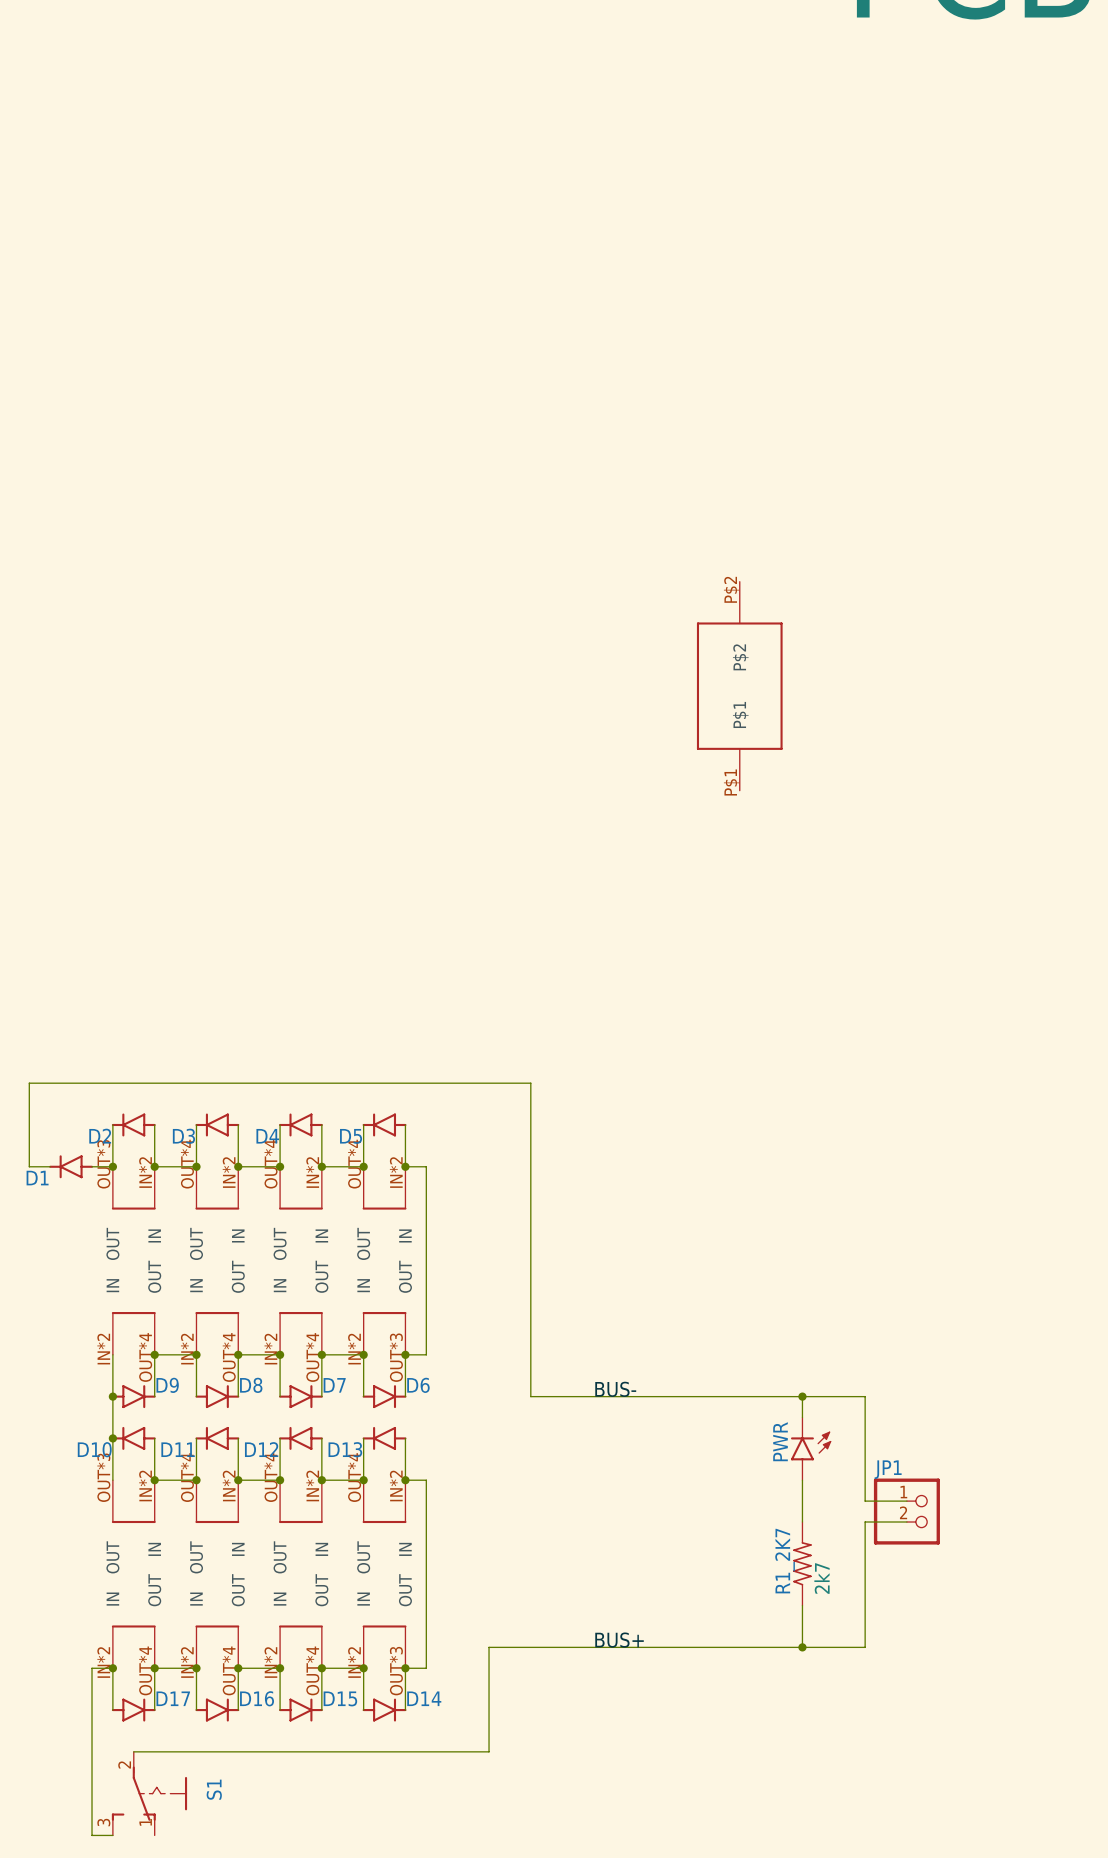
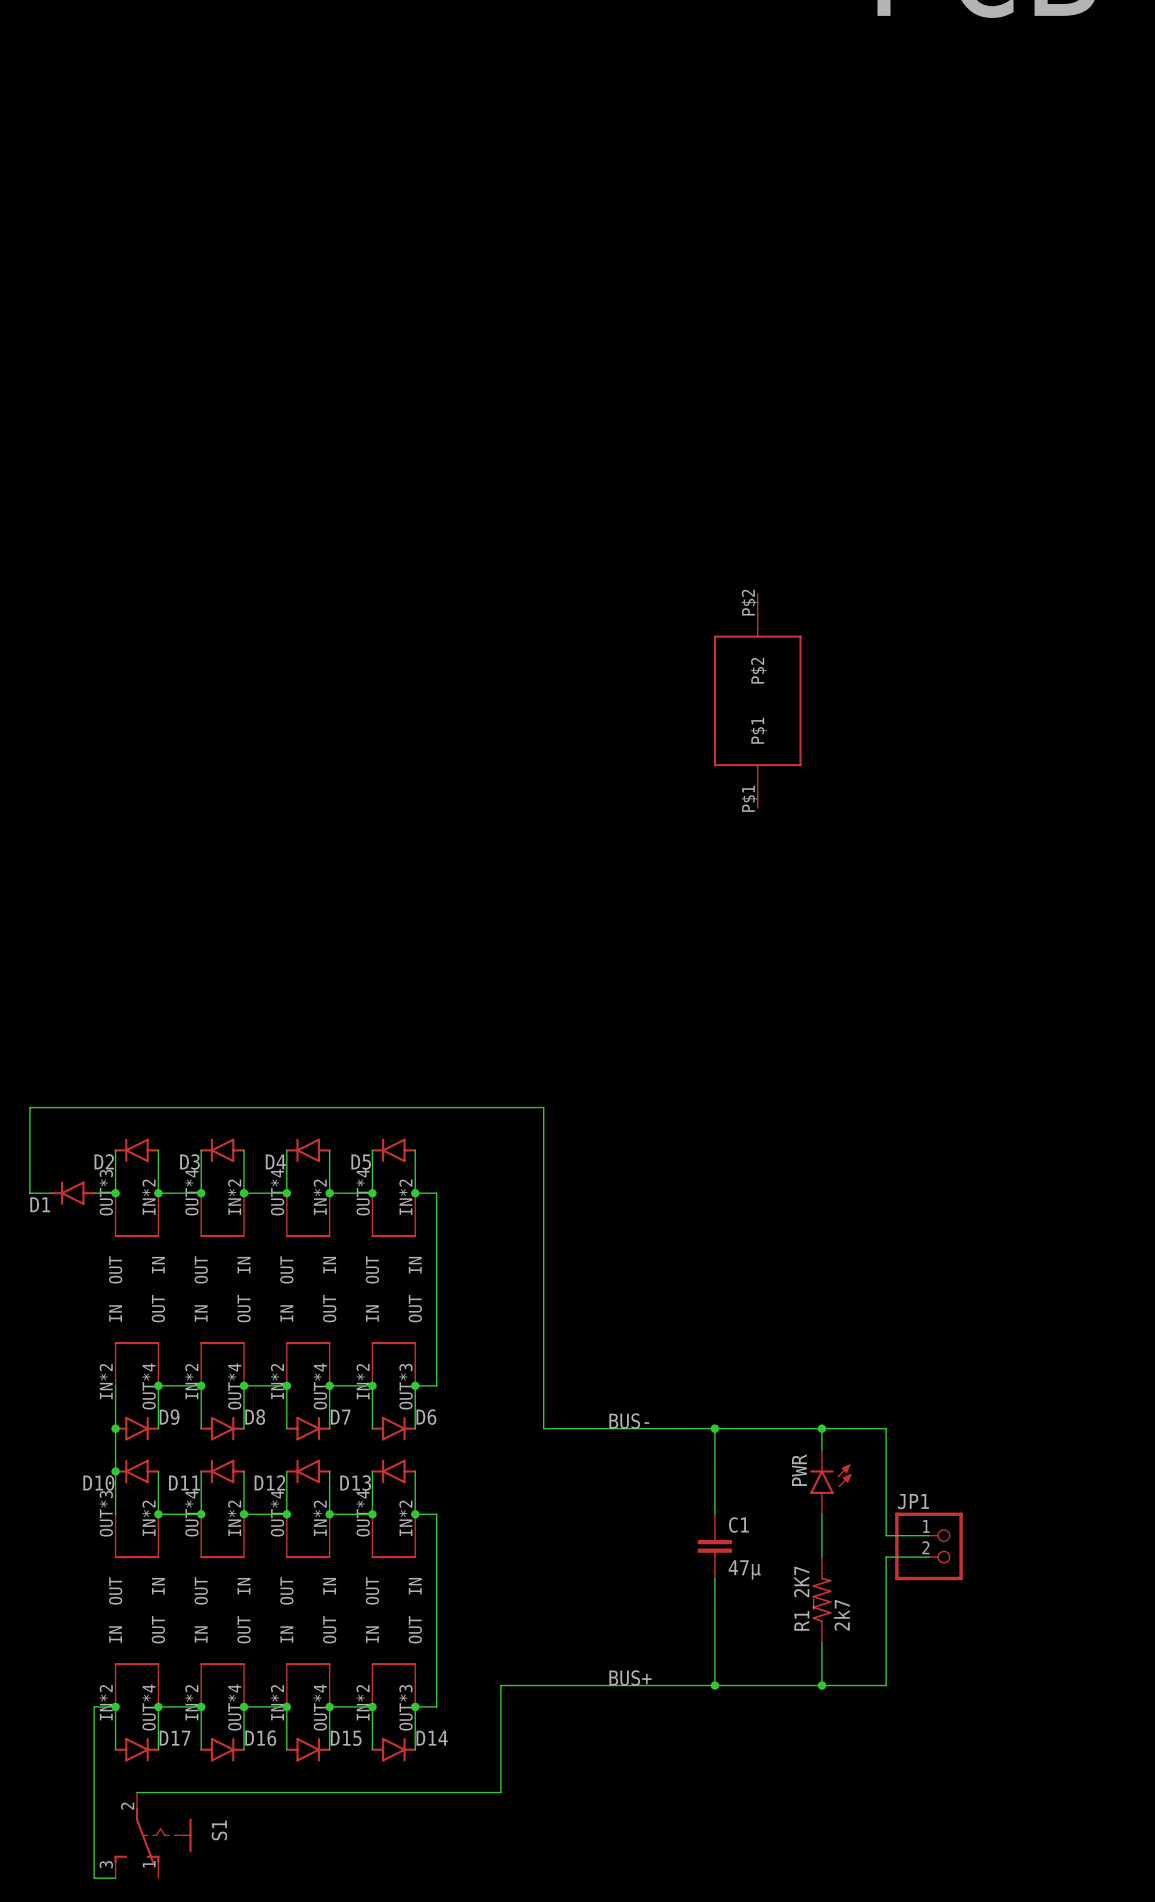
wire: none -> (714, 1428) (714, 1514)
junction: none -> (714, 1428)
C1: none -> 47µ (714, 1546)
wire: none -> (714, 1578) (714, 1685)
junction: none -> (714, 1685)

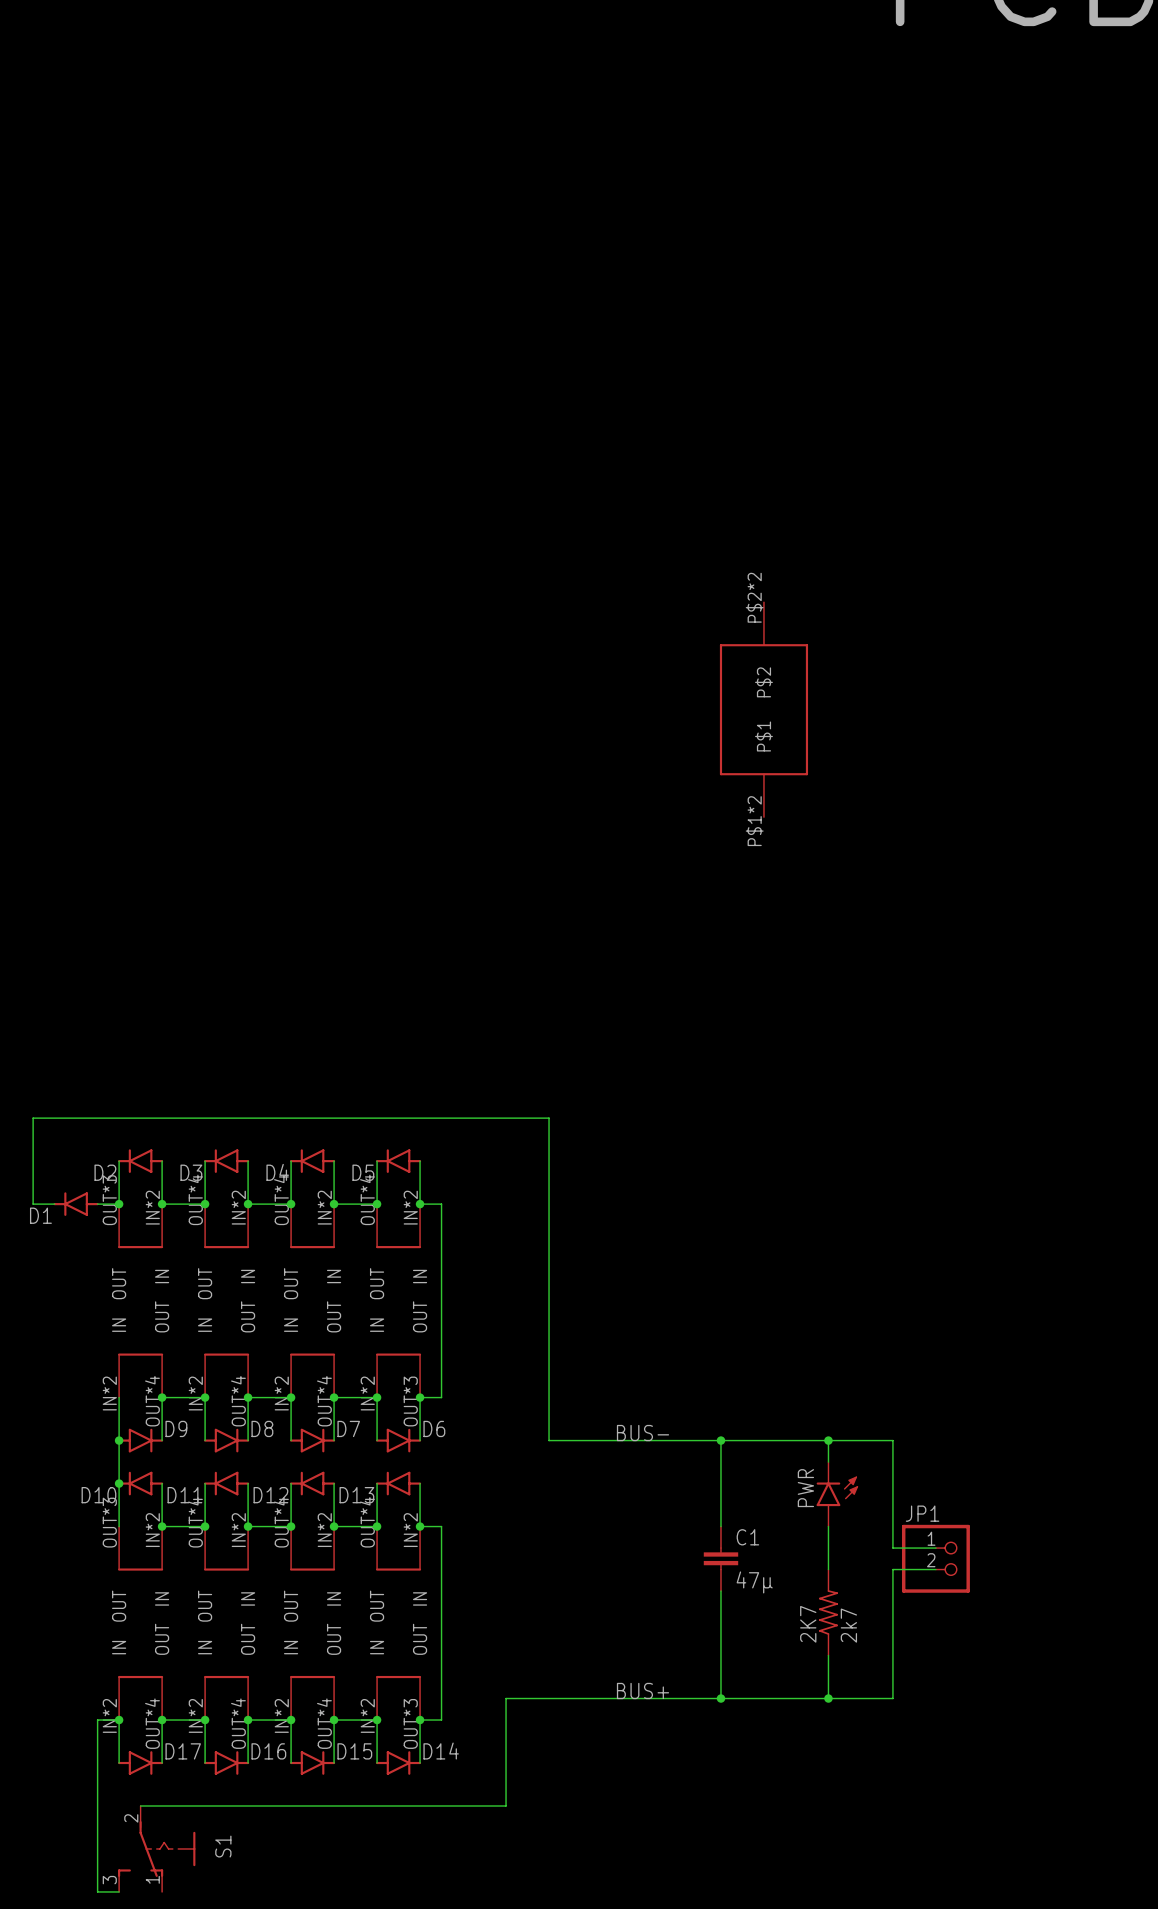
part pin number: P$2 (749, 602) -> P$2*2 (754, 597)
part pin number: P$1 (749, 798) -> P$1*2 (754, 821)
R1_2K7 name: R1_2K7 (804, 1598) -> 2K7 (808, 1624)

